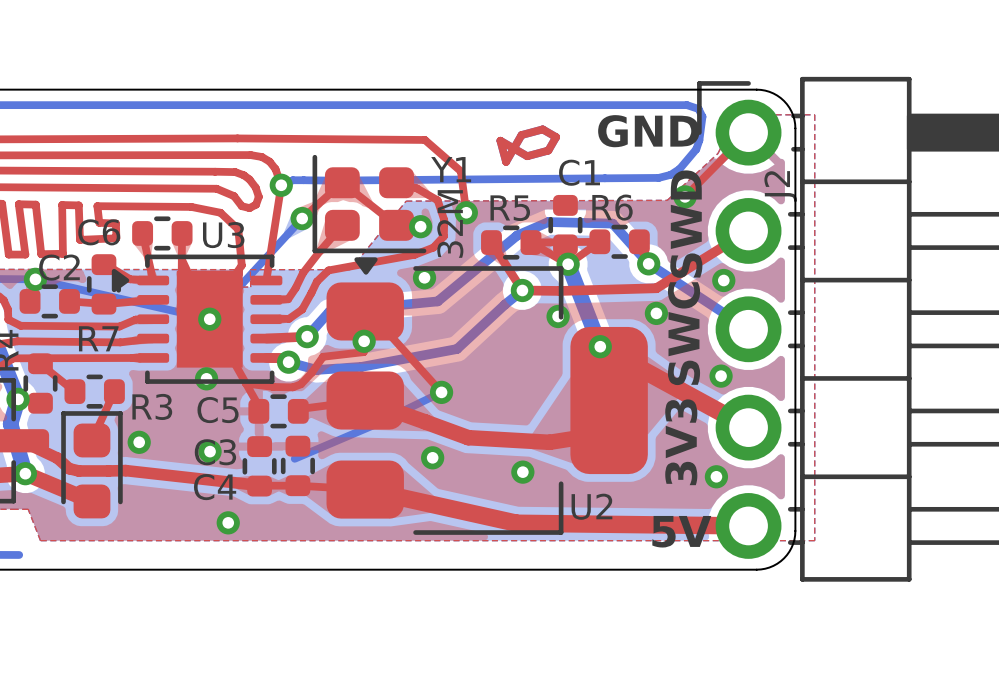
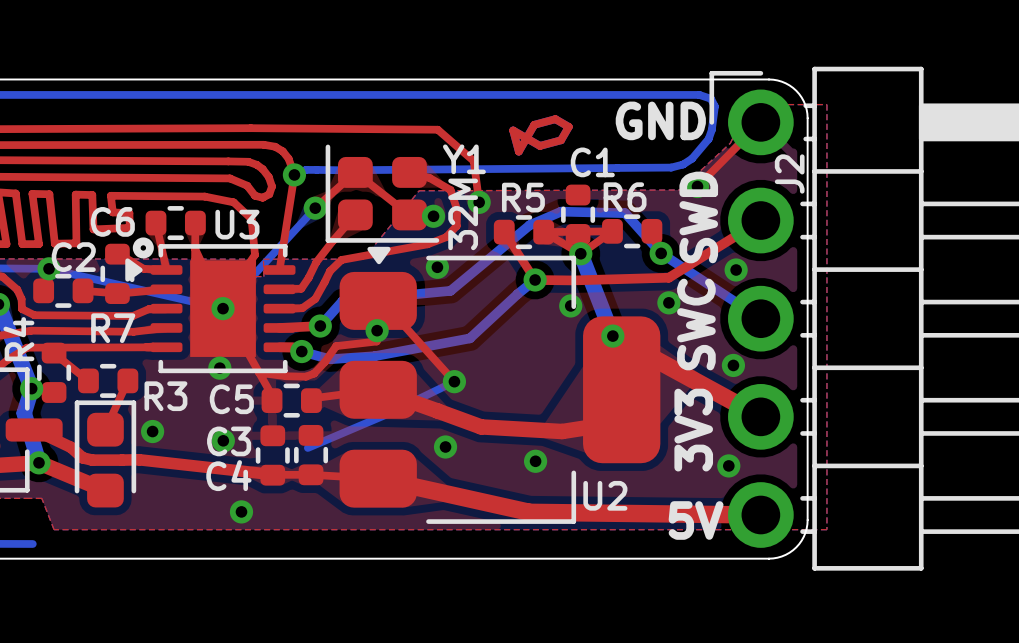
drawing: none -> [132, 237, 154, 259]

